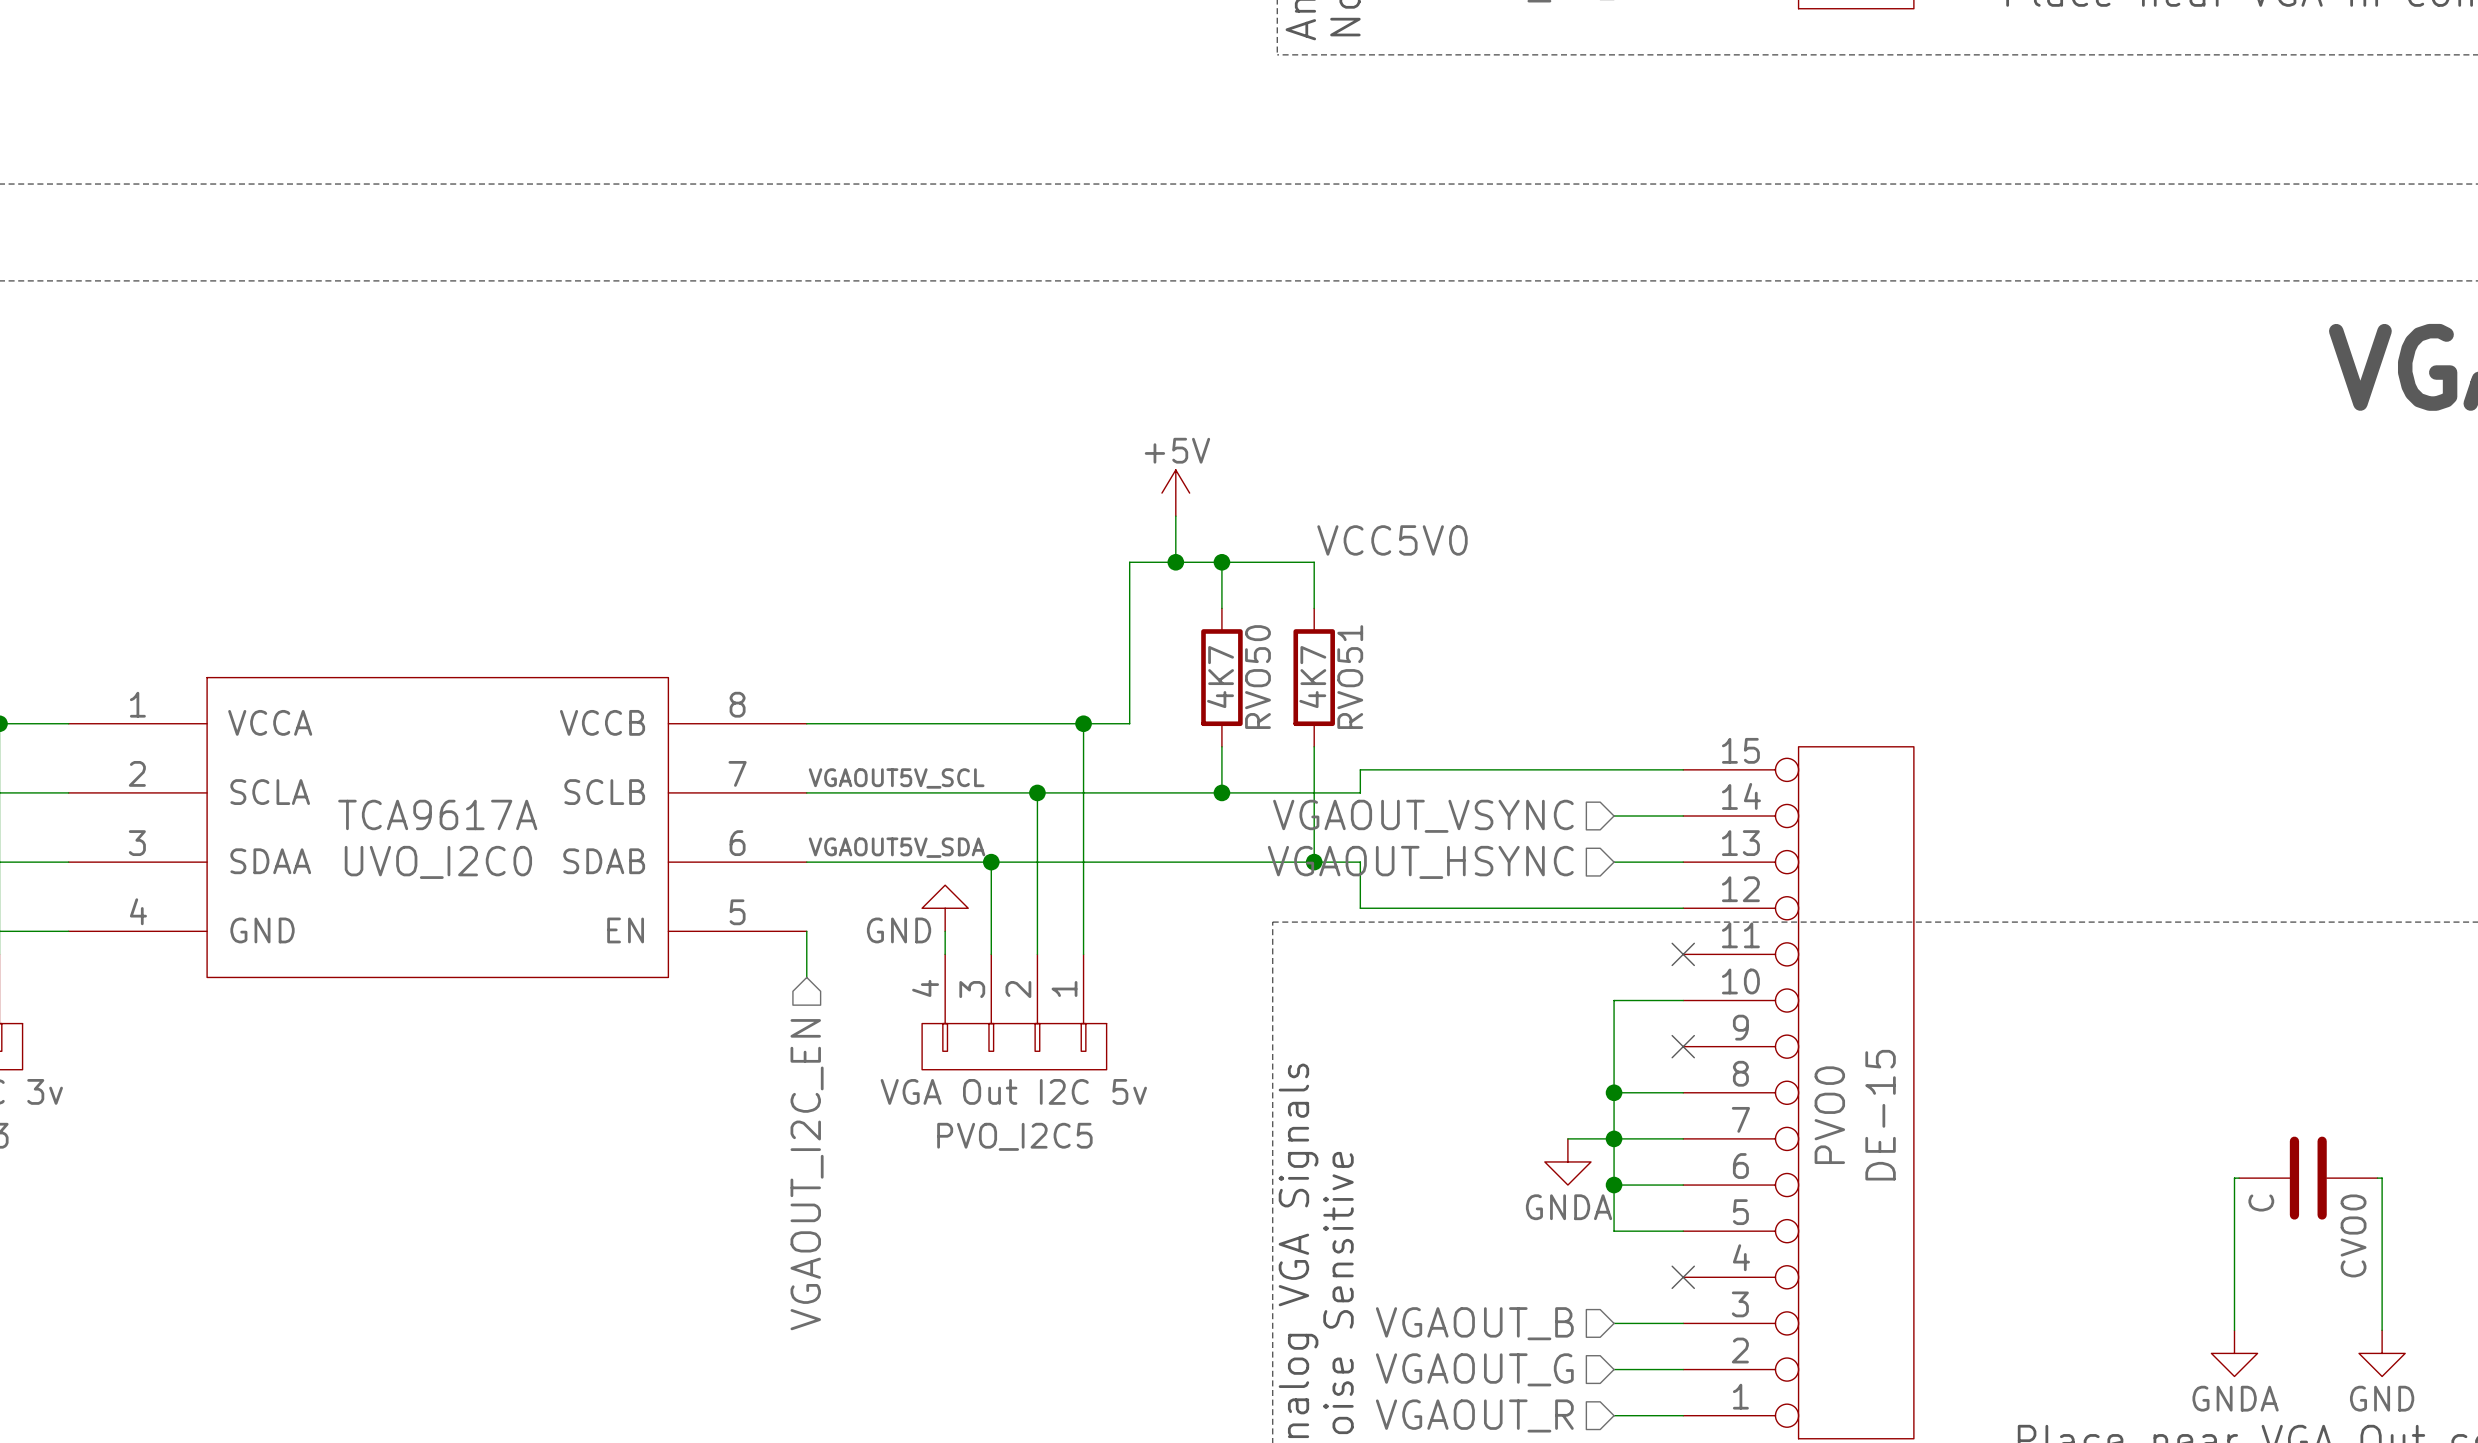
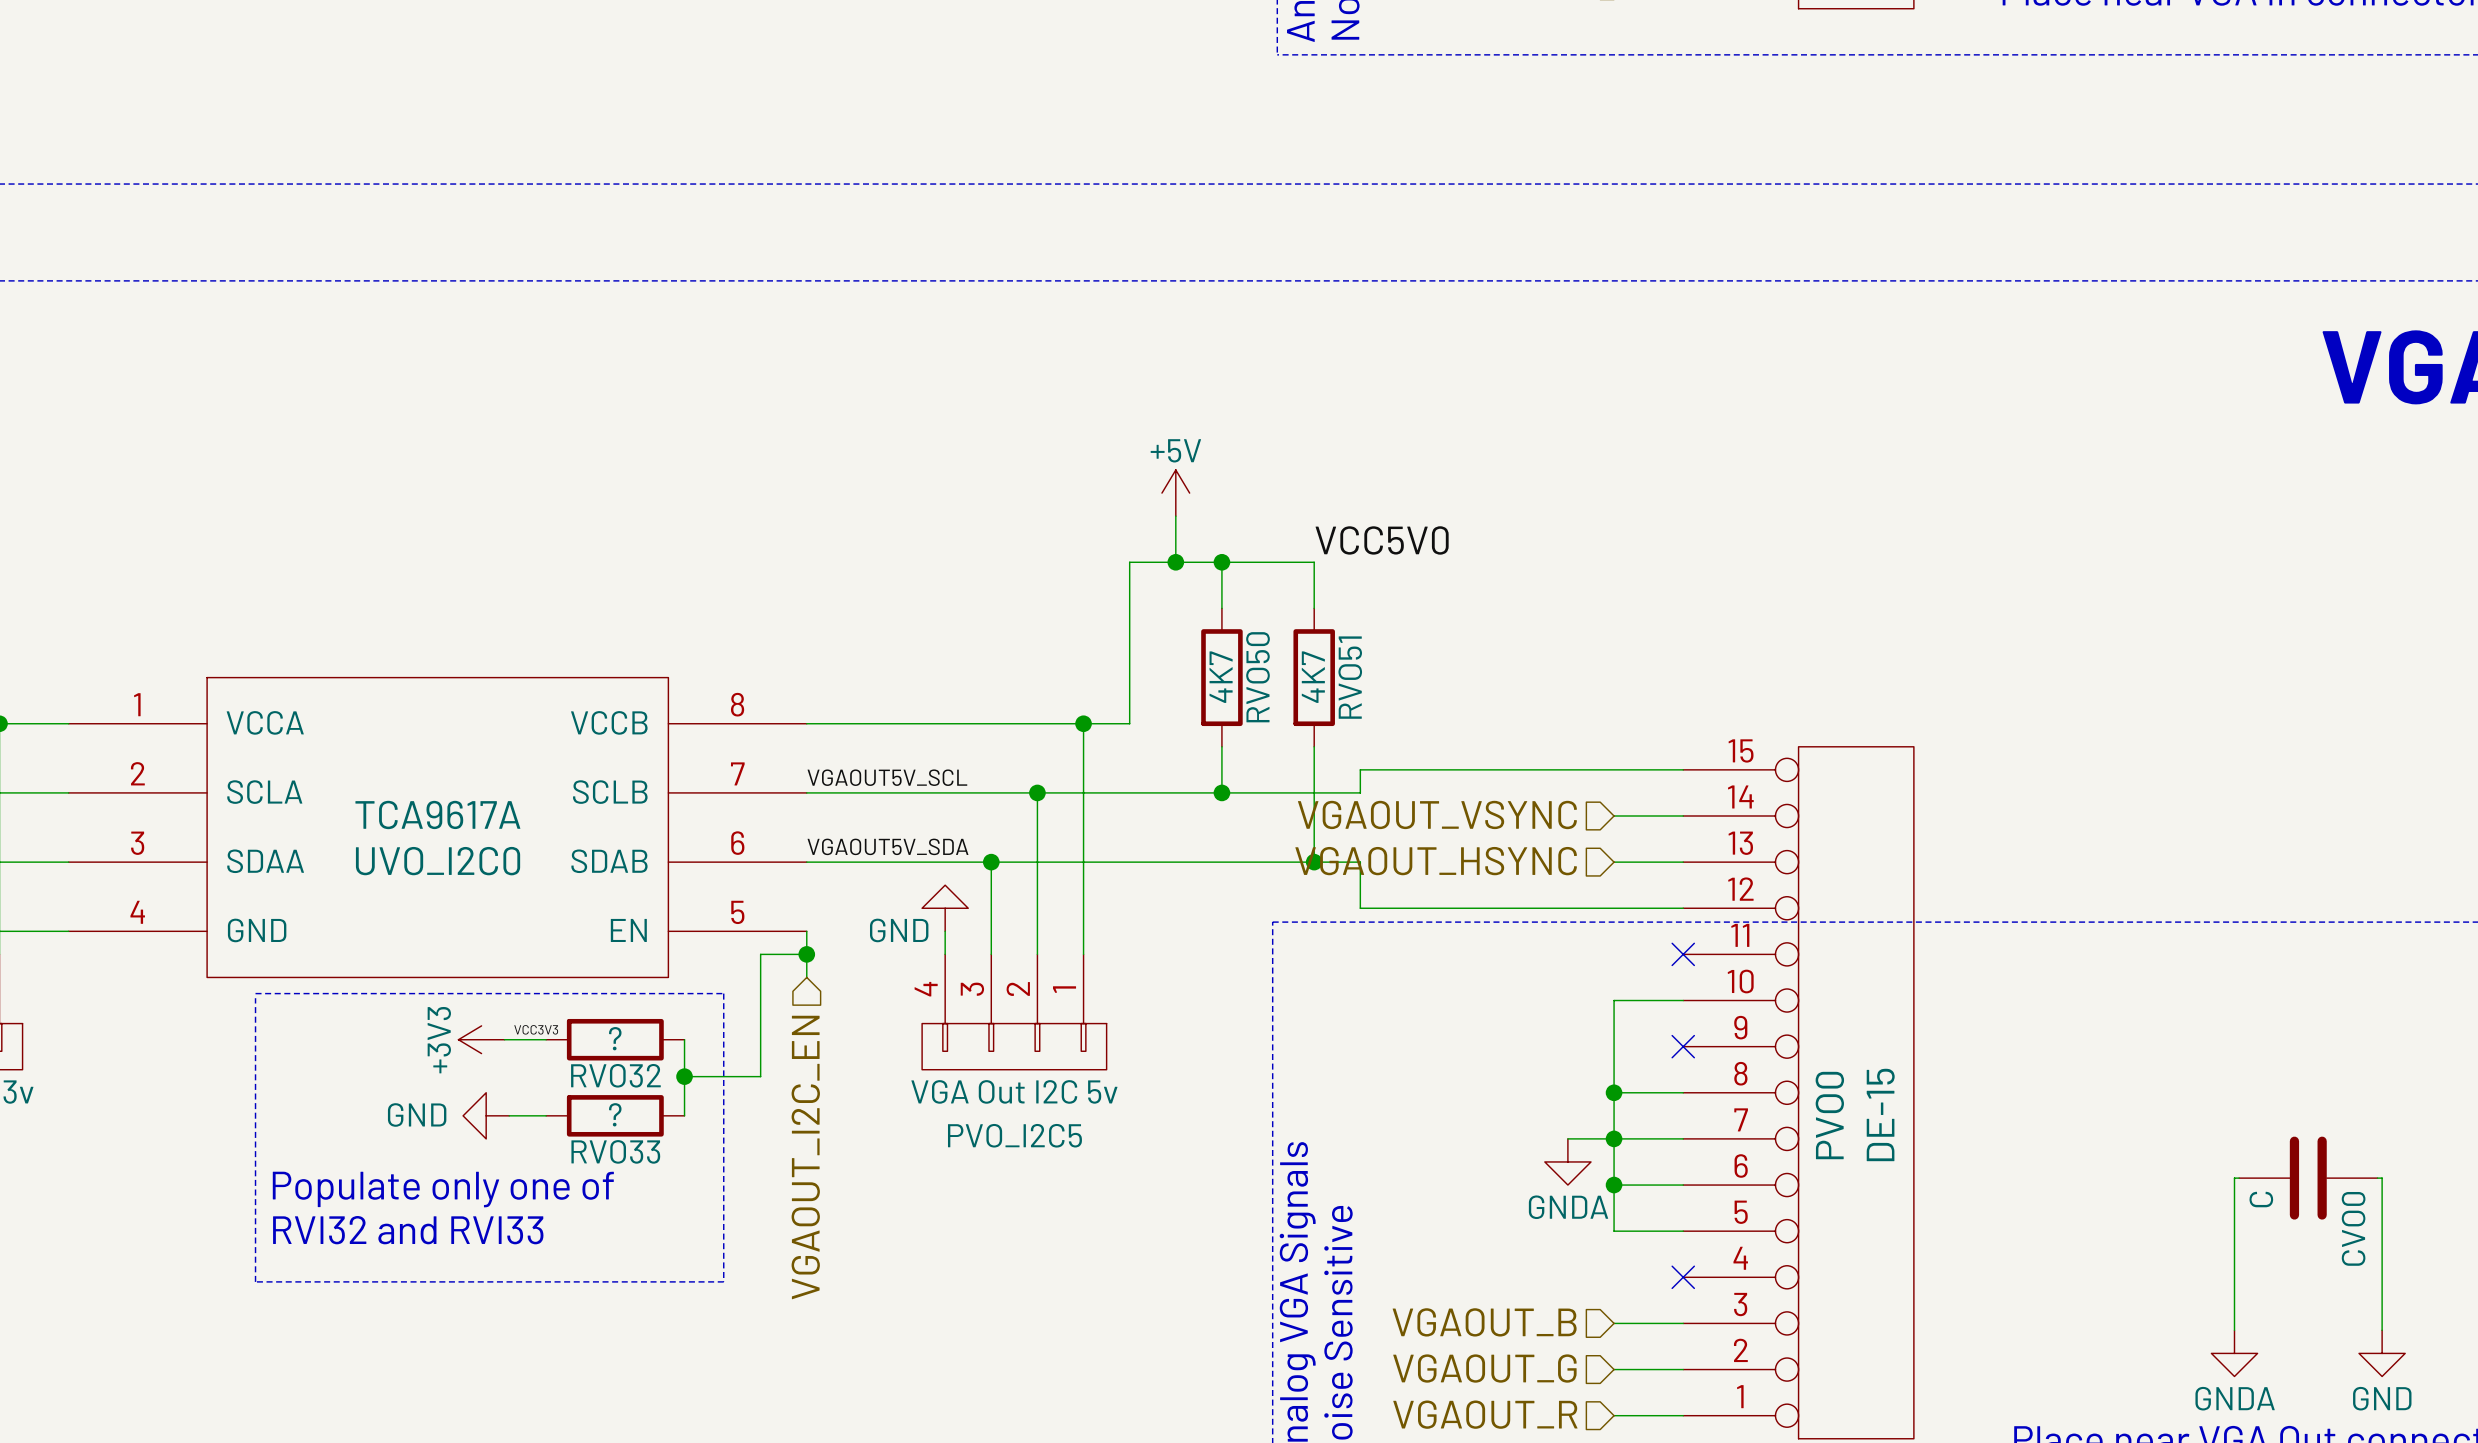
wire: none -> (806, 954) (760, 954) (760, 1076) (684, 1076)
junction: none -> (806, 954)
line: none -> (255, 993) (723, 993) (723, 1281) (255, 1281) (255, 998)
label: none -> VCC3V3 (536, 1029)
power symbol: none -> +3V3 (481, 1039)
wire: none -> (504, 1039) (546, 1039)
RVO32: none -> ? (615, 1039)
wire: none -> (684, 1039) (684, 1115)
junction: none -> (684, 1076)
power symbol: none -> GND (486, 1115)
wire: none -> (509, 1115) (546, 1115)
RVO33: none -> ? (615, 1115)
text: none -> Populate only one of (443, 1189)
text: none -> RVI32 and RVI33 (408, 1230)

